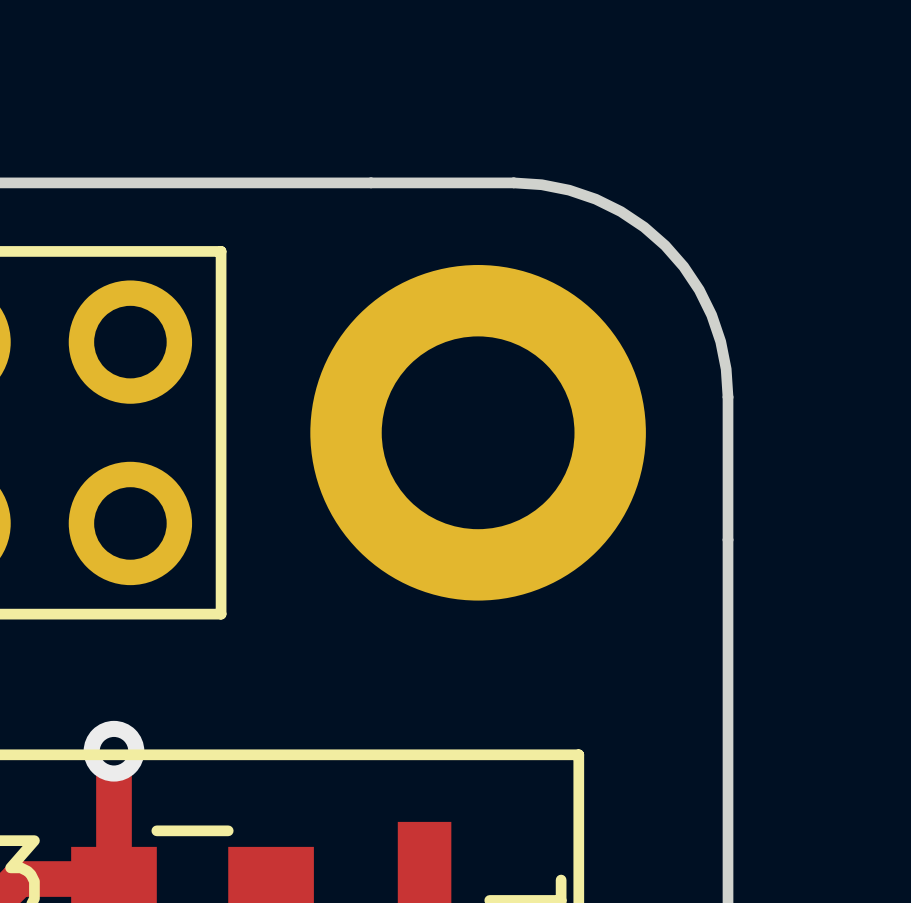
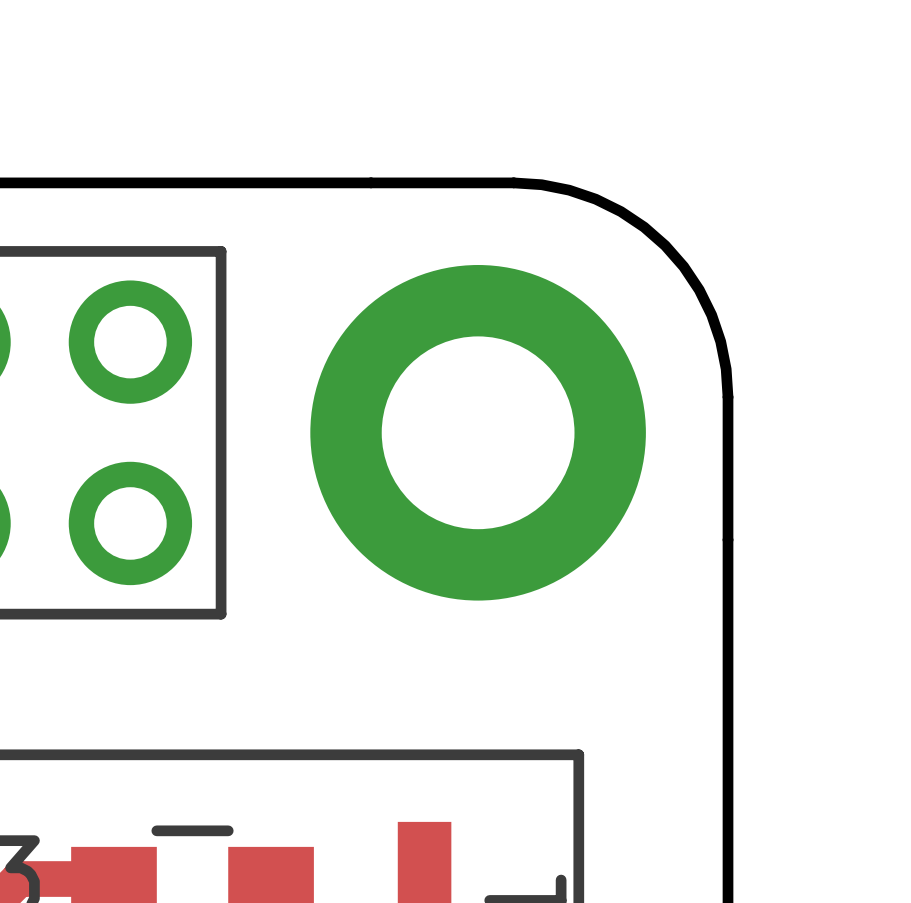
track: (113, 751) (113, 879) -> none
via: (113, 751) -> none

